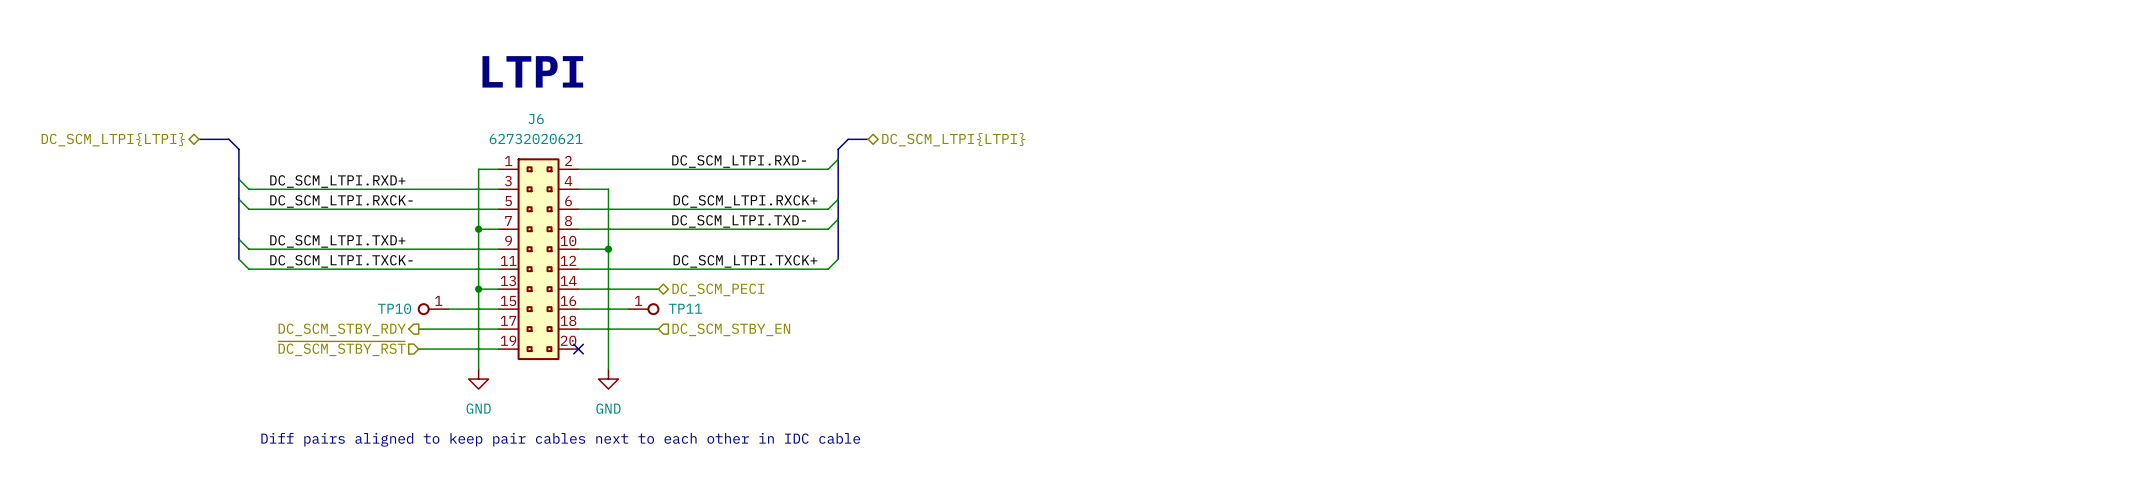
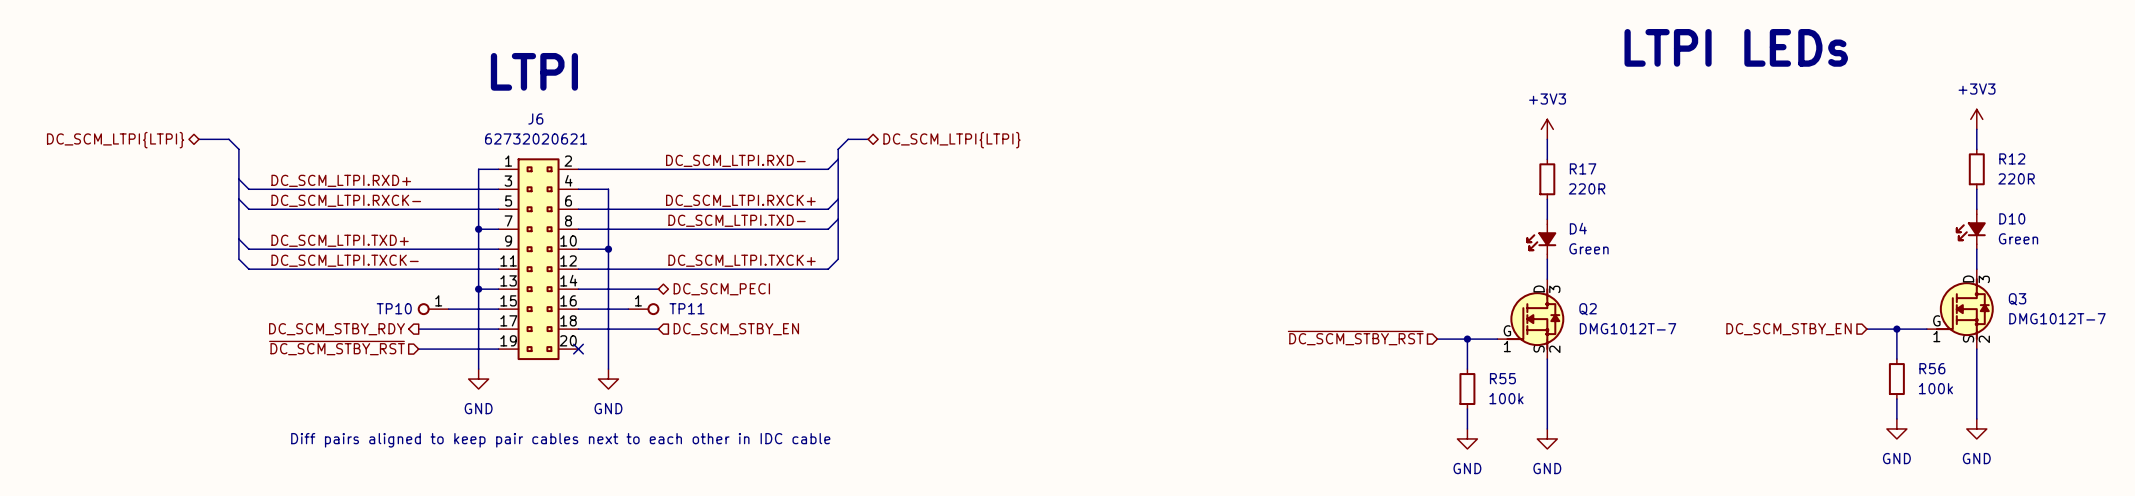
text: none -> LTPI LEDs (1736, 47)
power symbol: none -> +3V3 (1976, 119)
power symbol: none -> +3V3 (1547, 129)
wire: none -> (1976, 129) (1976, 149)
wire: none -> (1547, 139) (1547, 159)
R12: none -> (1976, 169)
R17: none -> (1547, 179)
wire: none -> (1976, 189) (1976, 209)
wire: none -> (1547, 199) (1547, 219)
D10: none -> (1970, 229)
D4: none -> (1541, 239)
wire: none -> (1976, 249) (1976, 269)
wire: none -> (1547, 259) (1547, 279)
Q3: none -> (1960, 309)
Q2: none -> (1530, 319)
hierarchical label: none -> DC_SCM_STBY_EN (1789, 329)
wire: none -> (1866, 329) (1926, 329)
wire: none -> (1896, 329) (1896, 359)
junction: none -> (1896, 329)
hierarchical label: none -> ~{DC_SCM_STBY_RST} (1355, 338)
wire: none -> (1437, 339) (1497, 339)
wire: none -> (1467, 339) (1467, 369)
junction: none -> (1467, 339)
wire: none -> (1976, 349) (1976, 418)
wire: none -> (1547, 359) (1547, 428)
R56: none -> (1896, 379)
R55: none -> (1467, 389)
wire: none -> (1896, 399) (1896, 418)
wire: none -> (1467, 409) (1467, 428)
power symbol: none -> GND (1896, 428)
power symbol: none -> GND (1976, 428)
power symbol: none -> GND (1467, 438)
power symbol: none -> GND (1547, 438)

